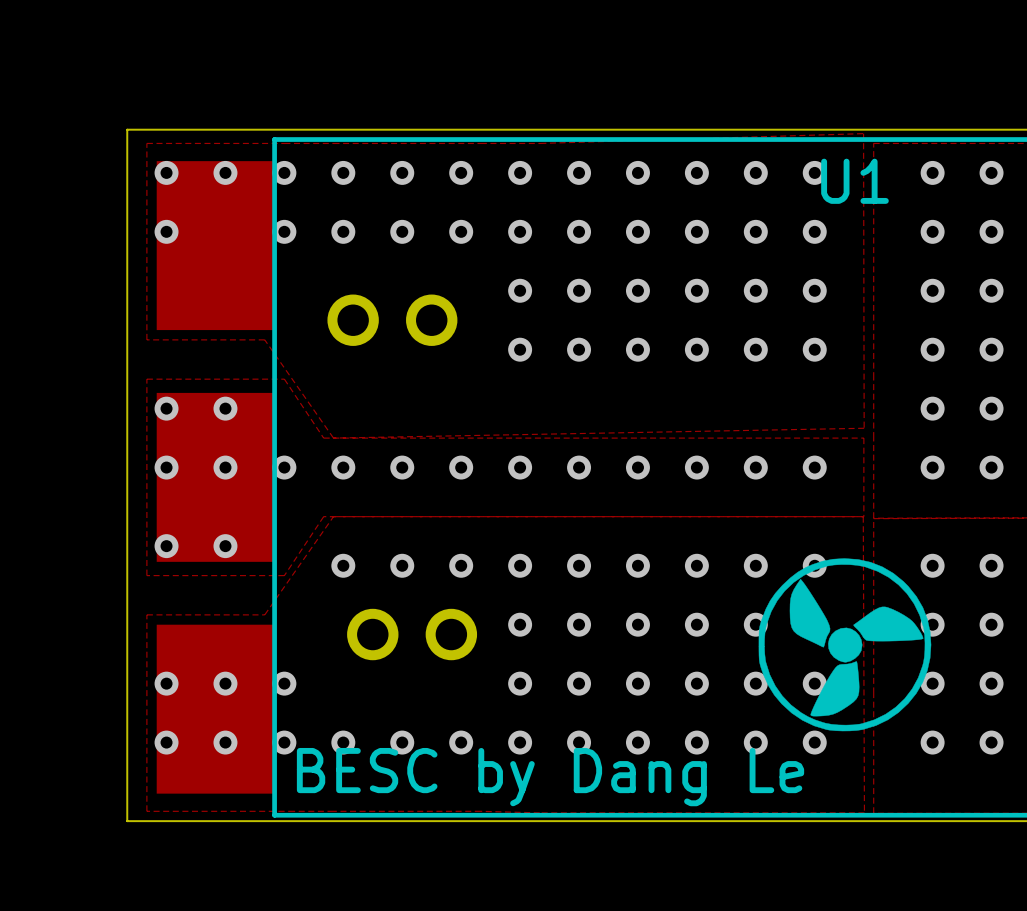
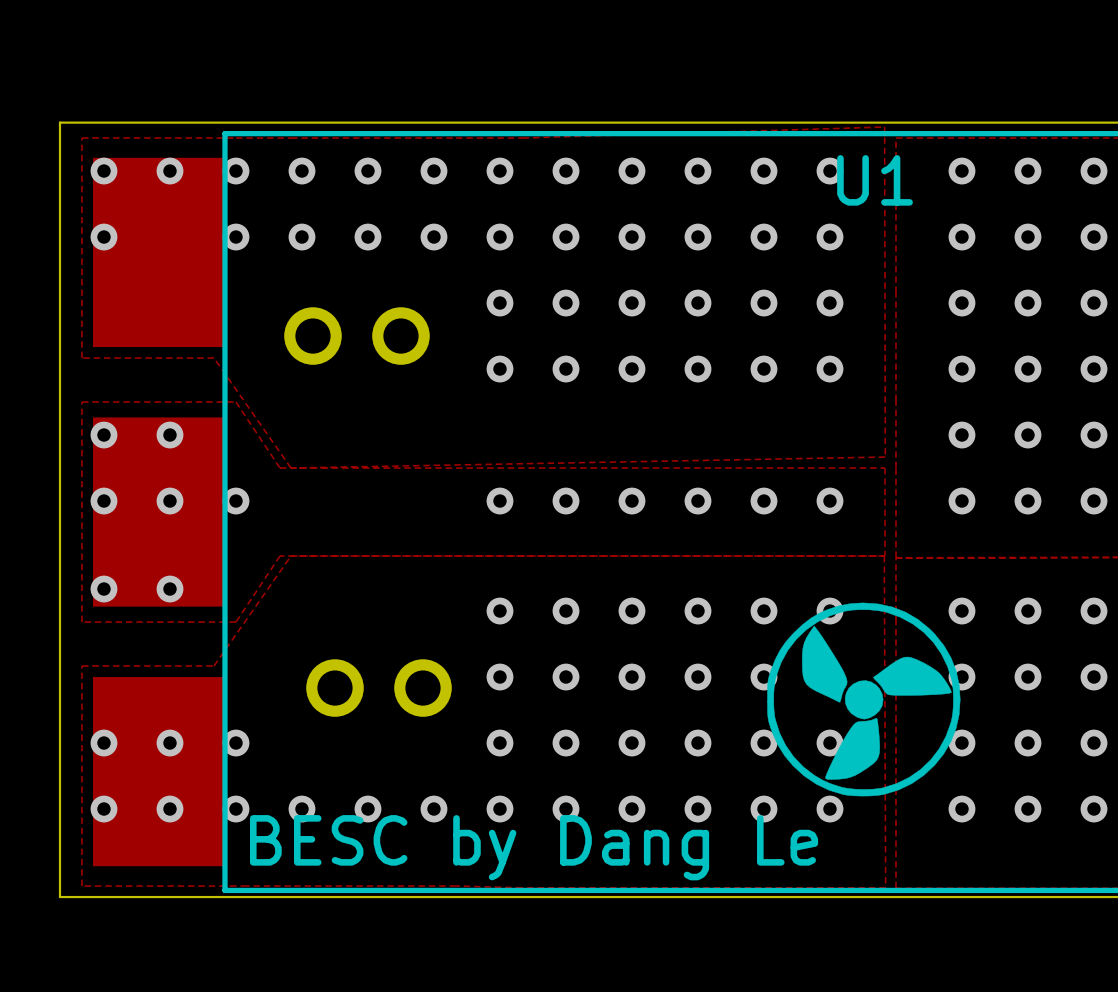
via: (343, 467) -> none
via: (402, 467) -> none
via: (461, 467) -> none
via: (343, 565) -> none
via: (402, 565) -> none
via: (461, 565) -> none

